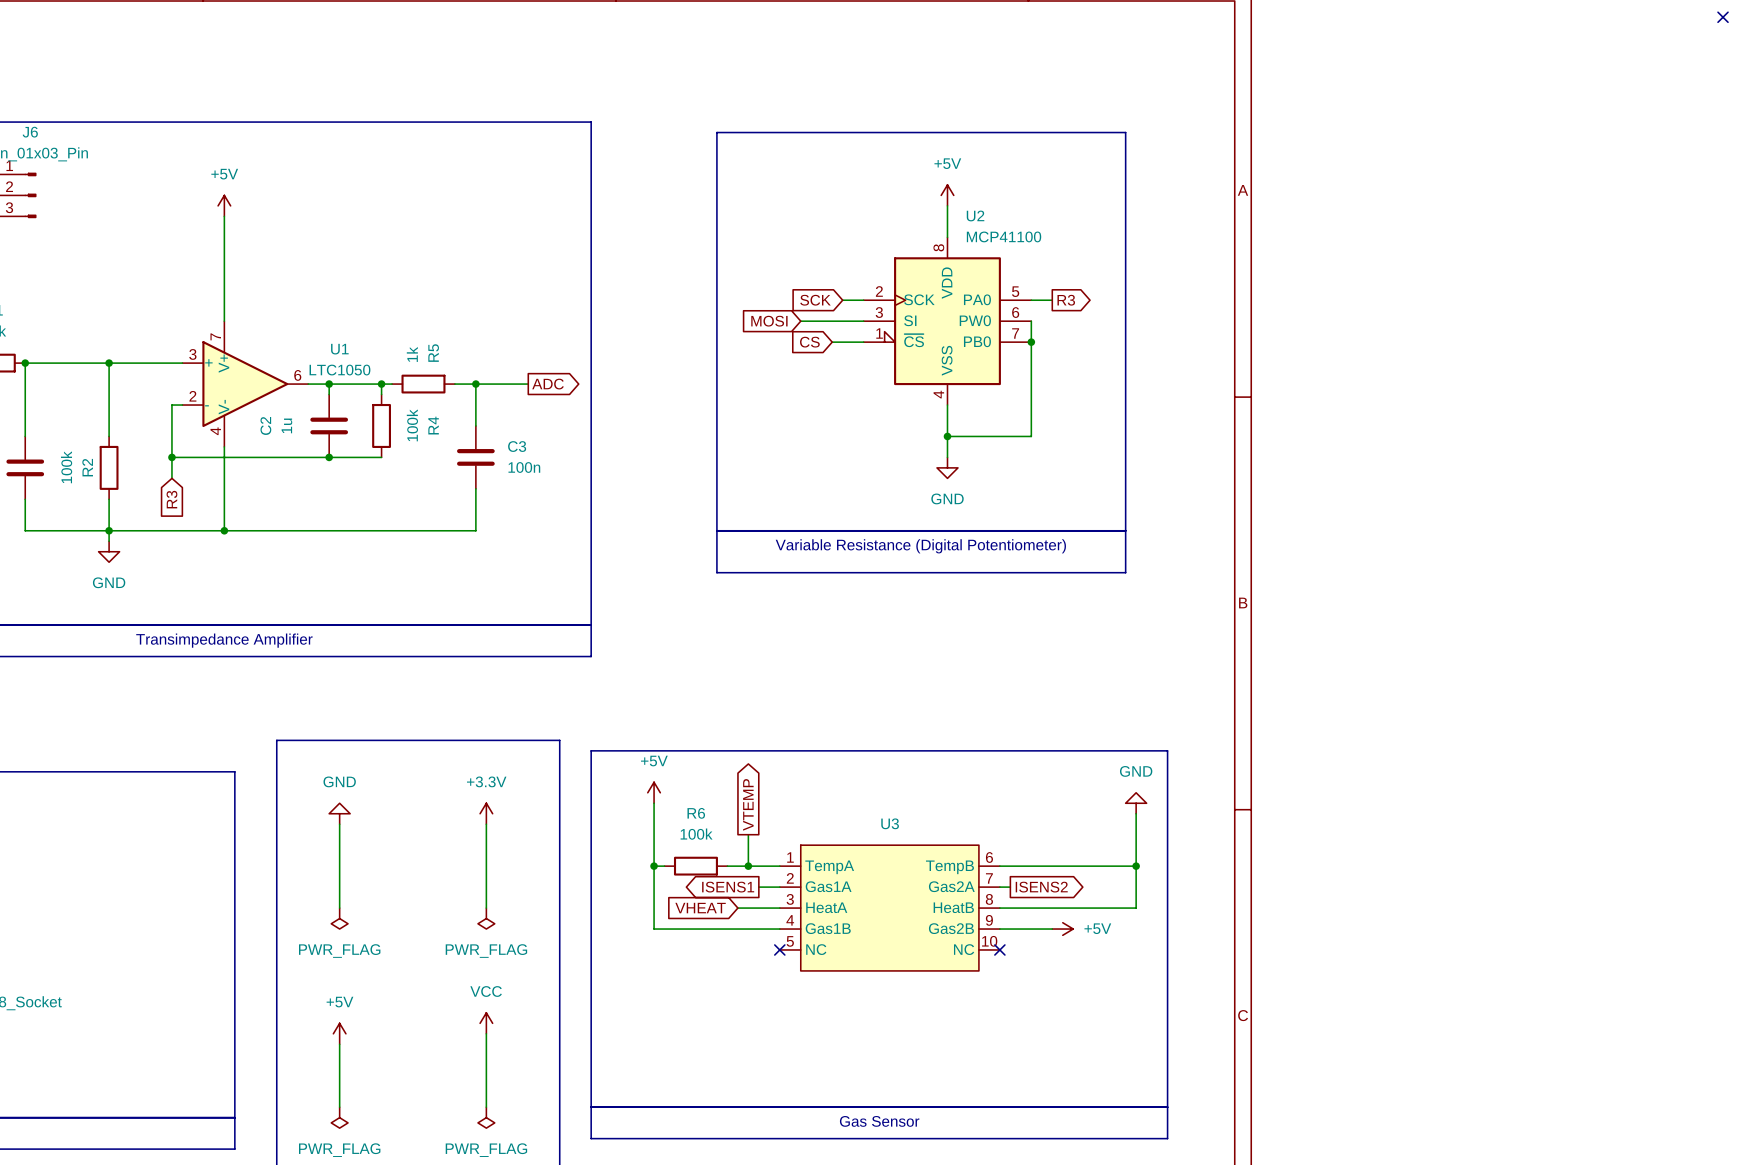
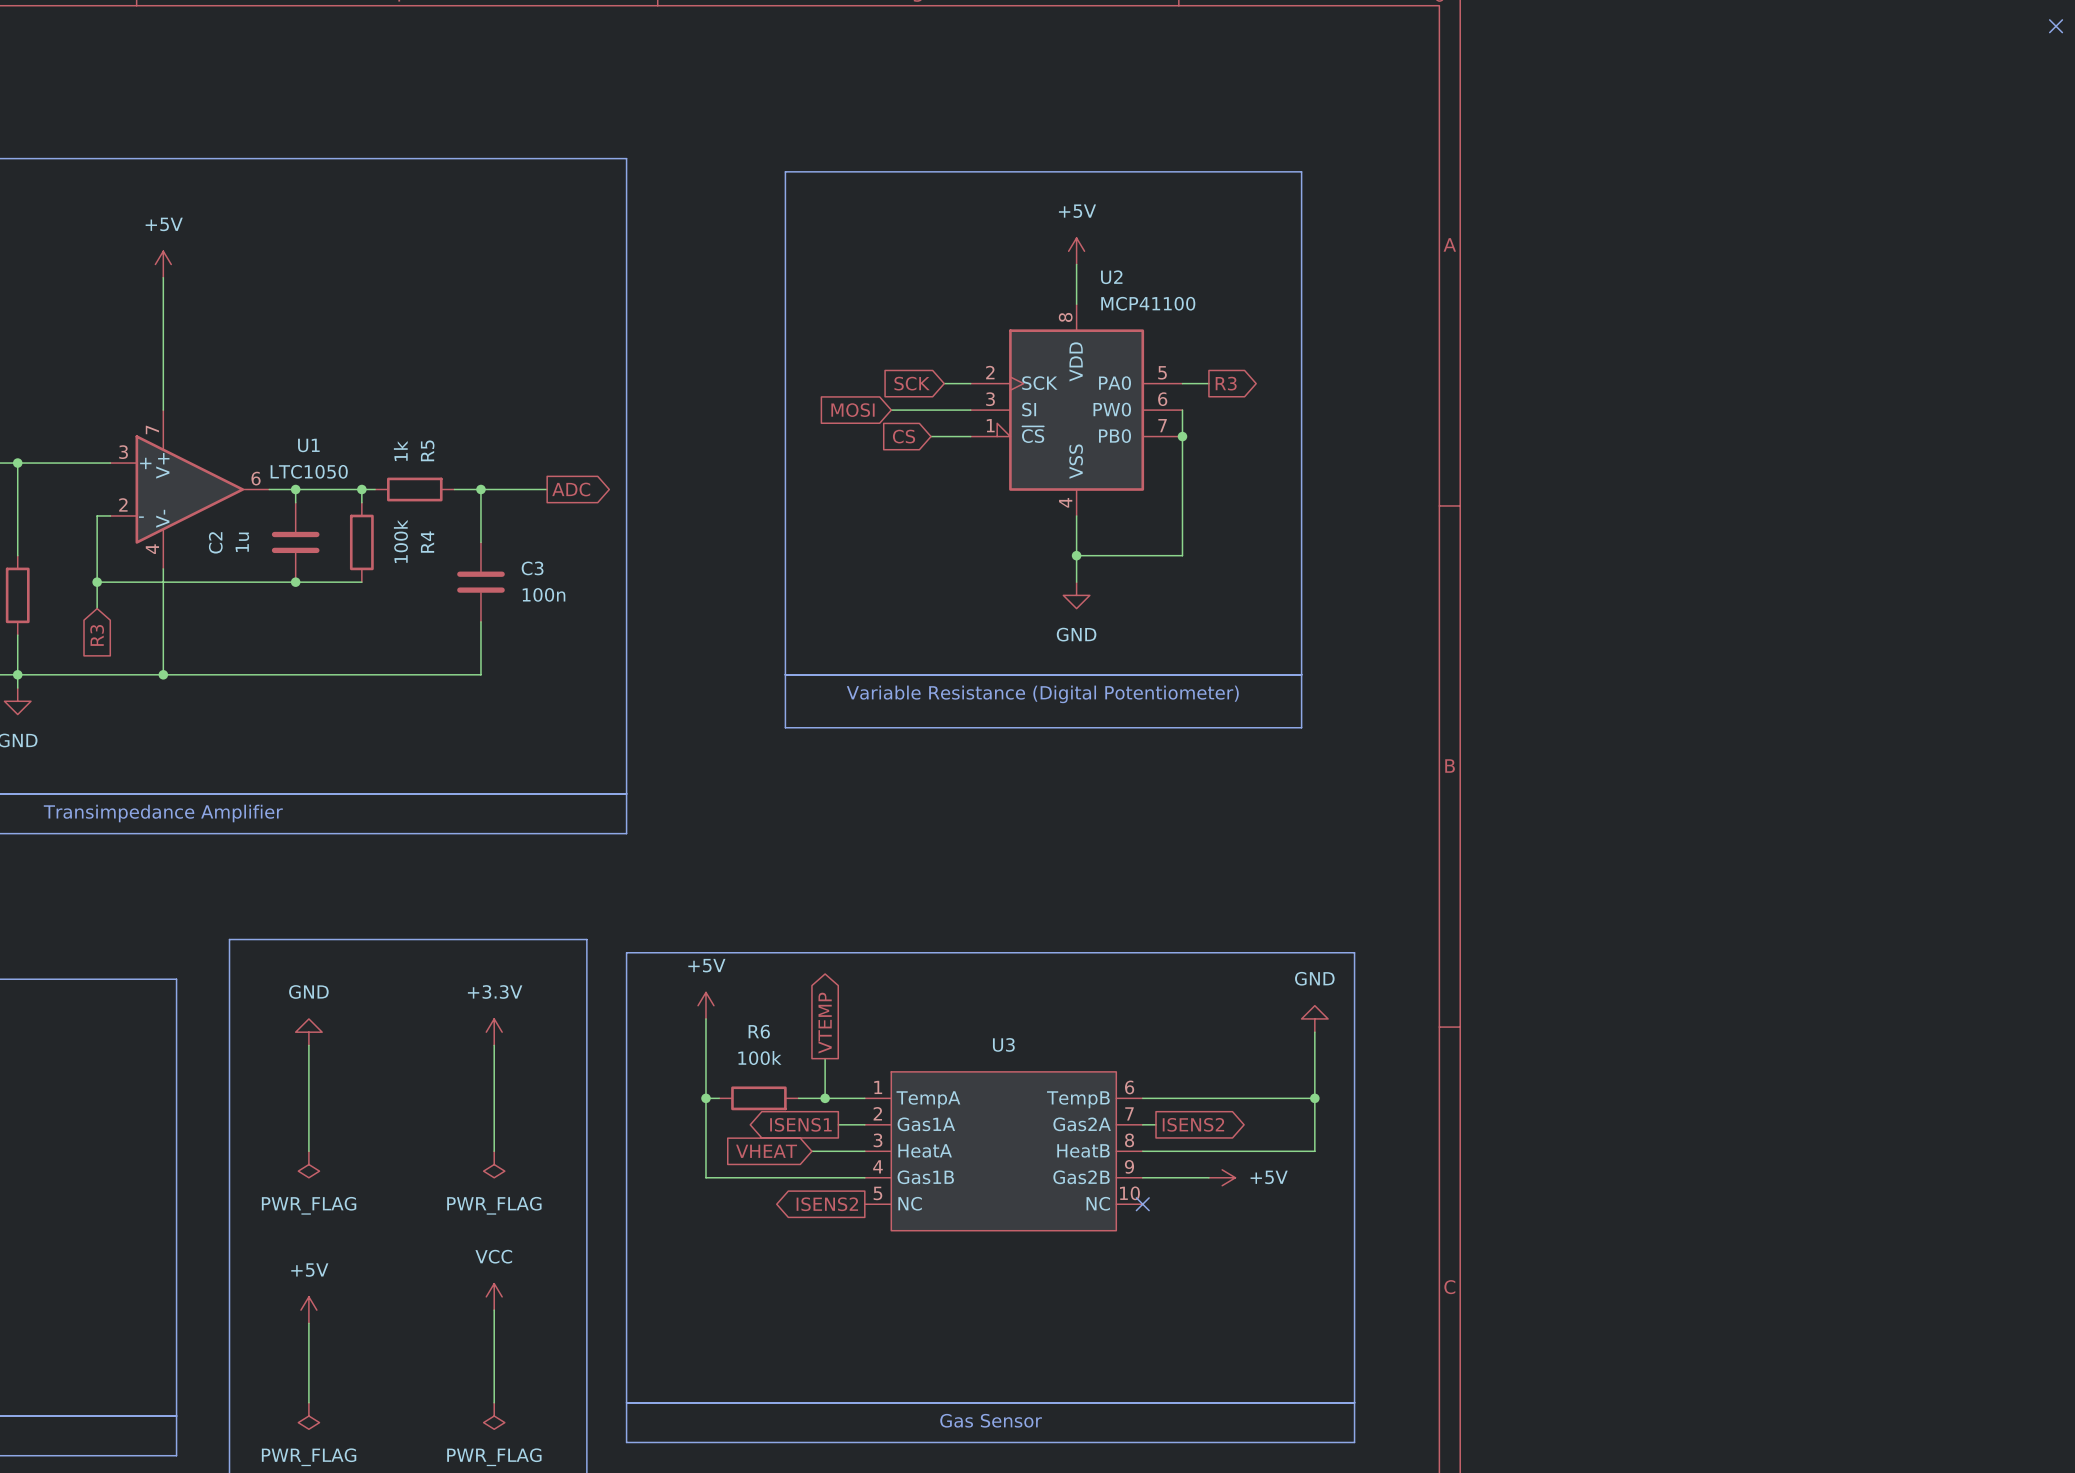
global label: none -> ISENS2 (827, 1204)
no-connect mark: (779, 949) -> none

